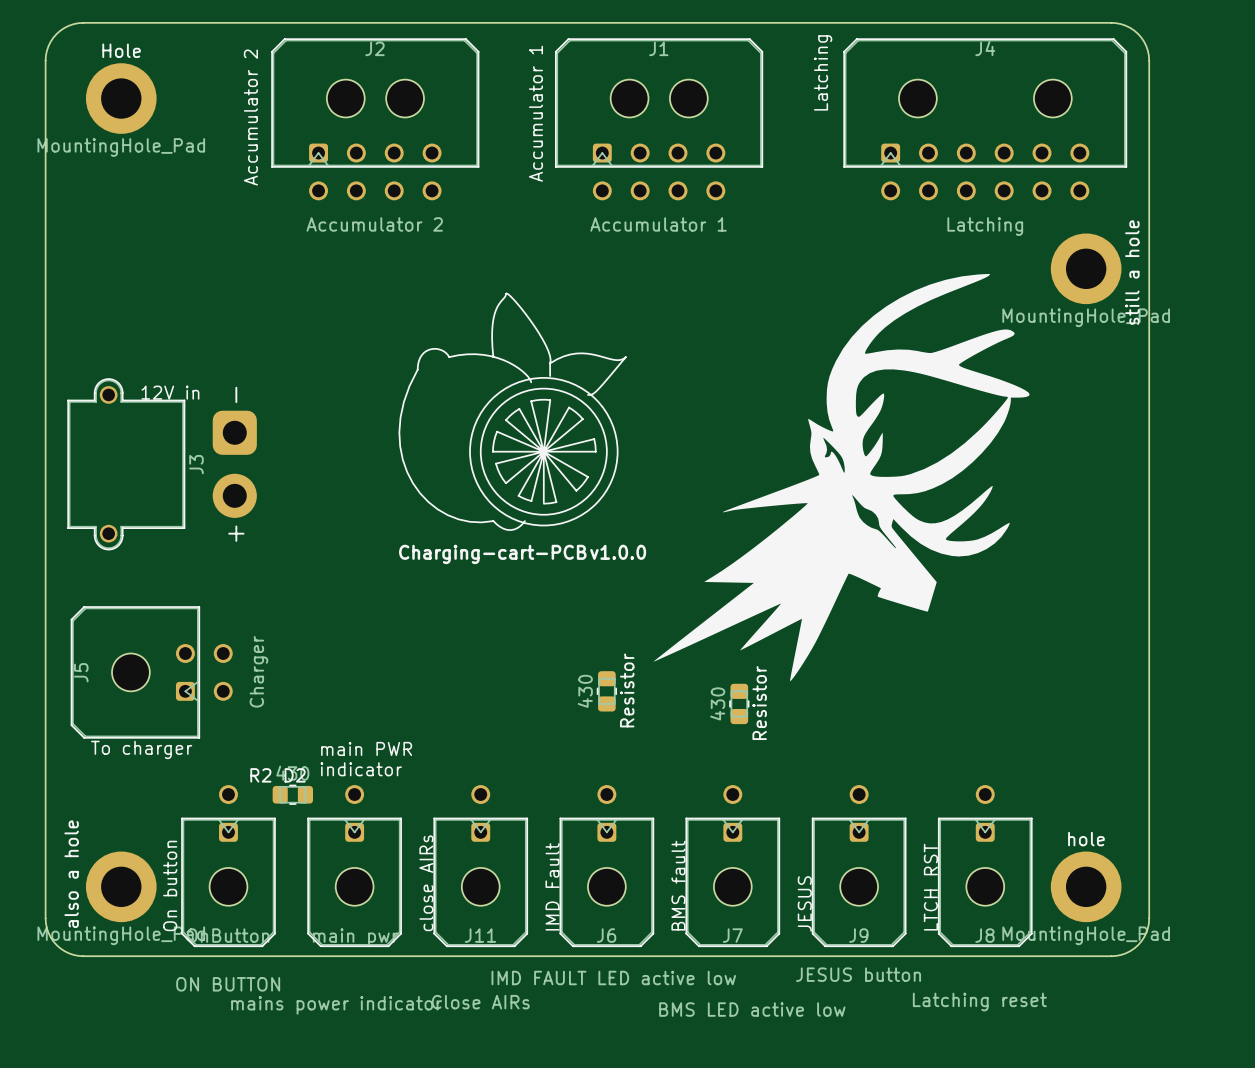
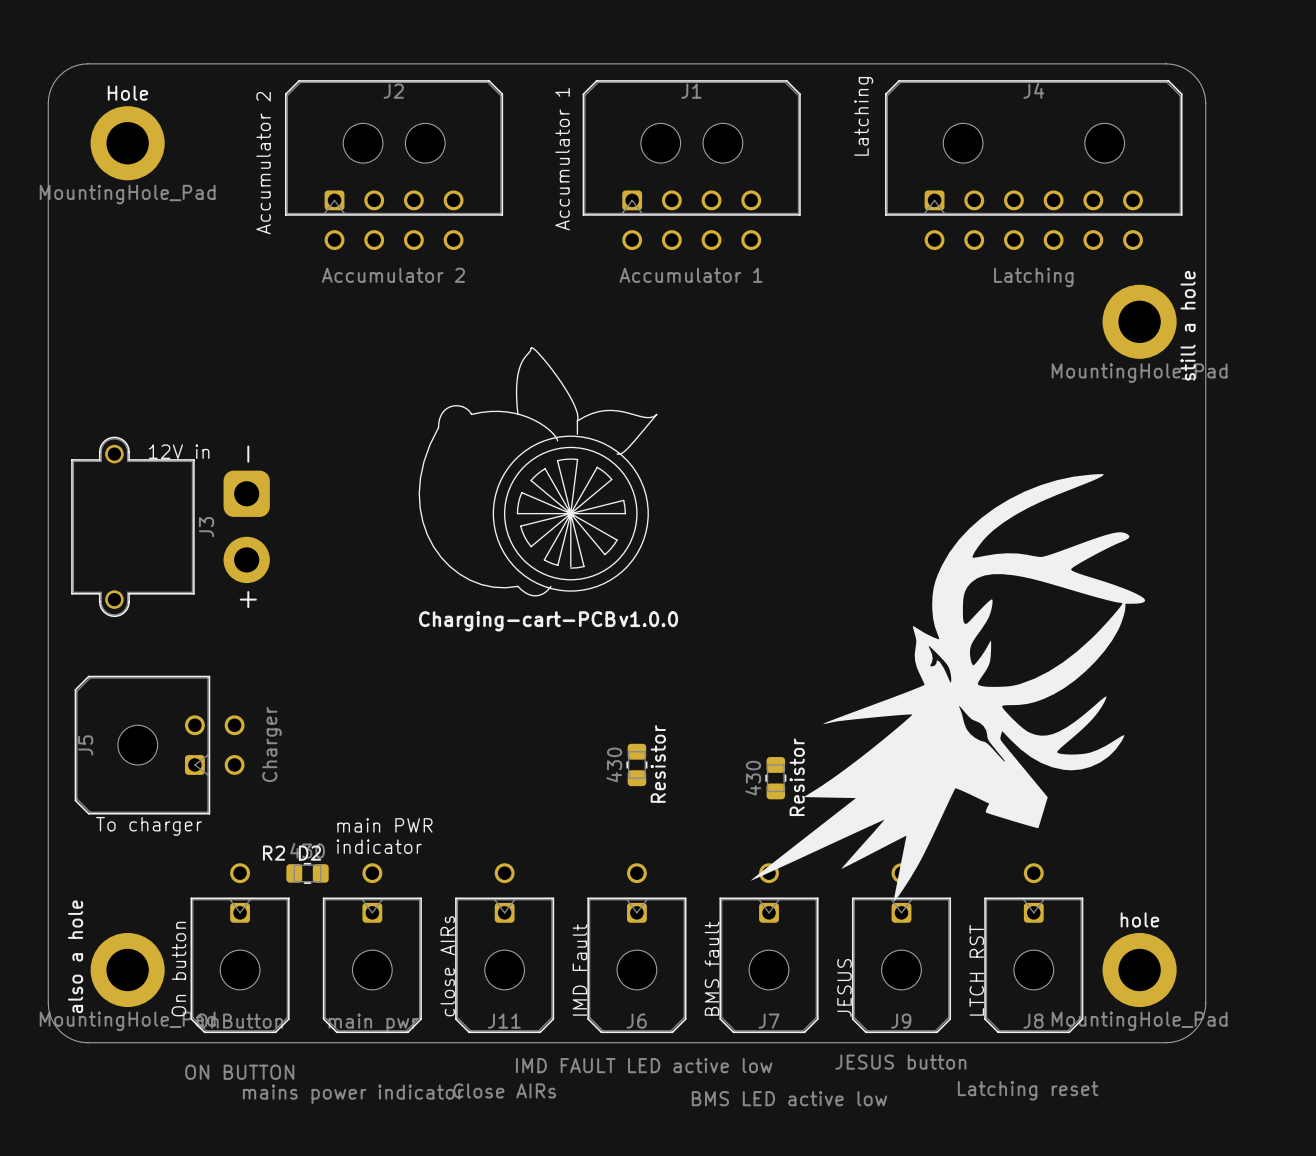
drawing position: (841, 477) -> (947, 687)

